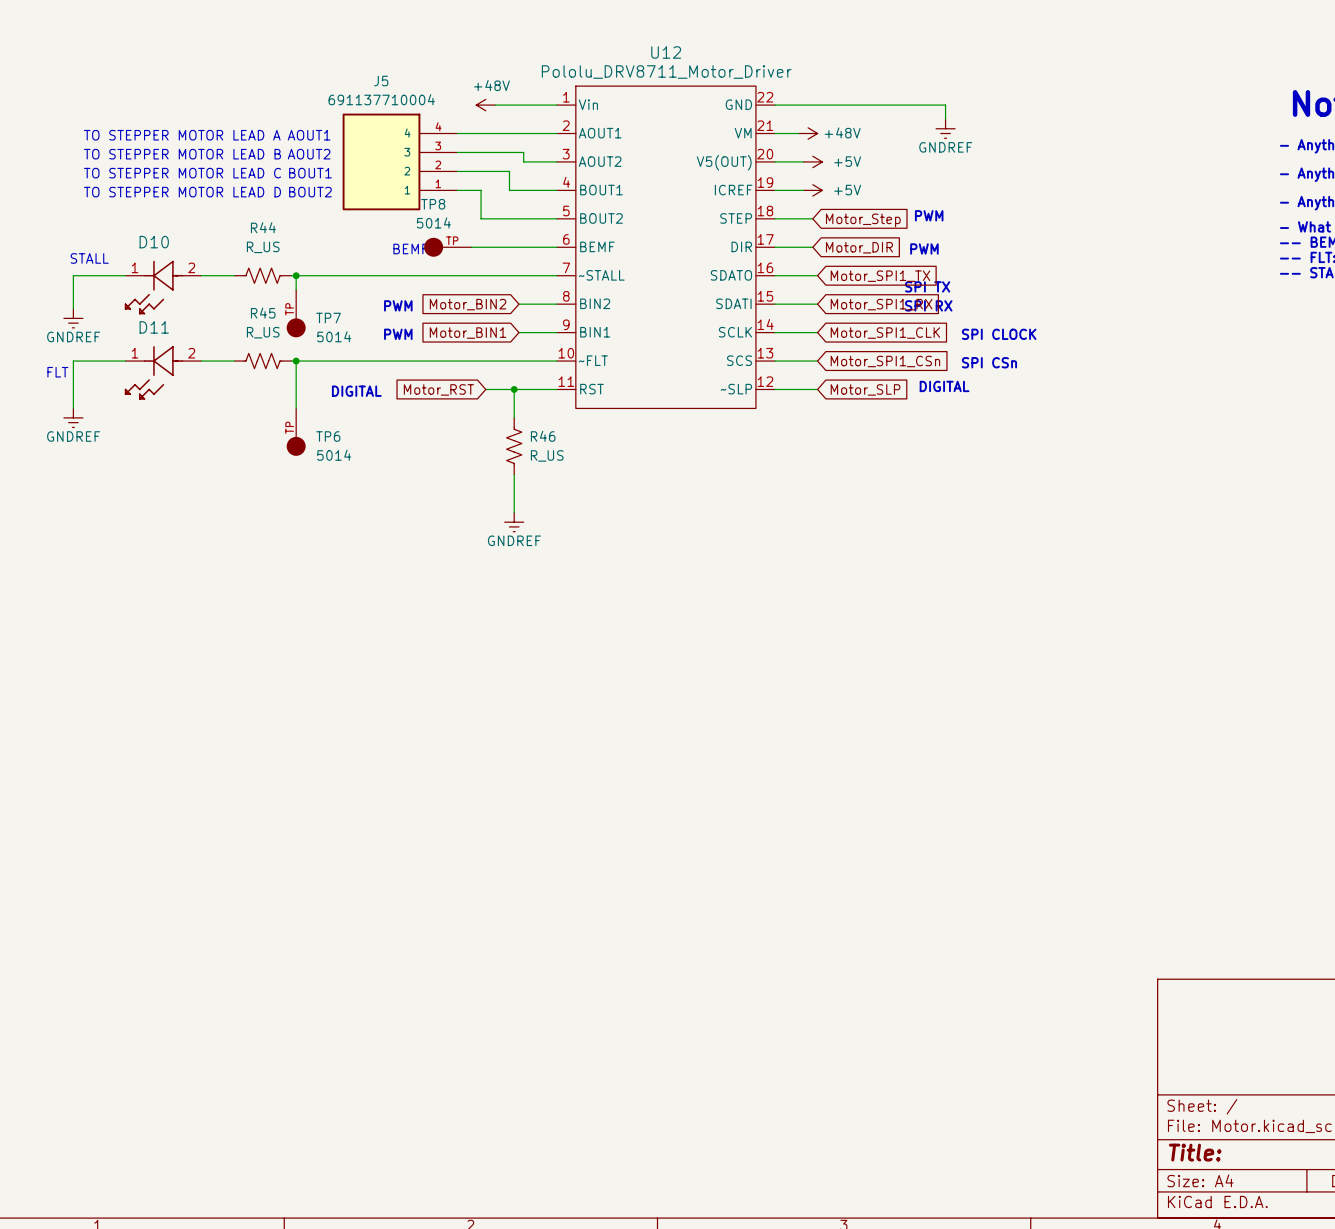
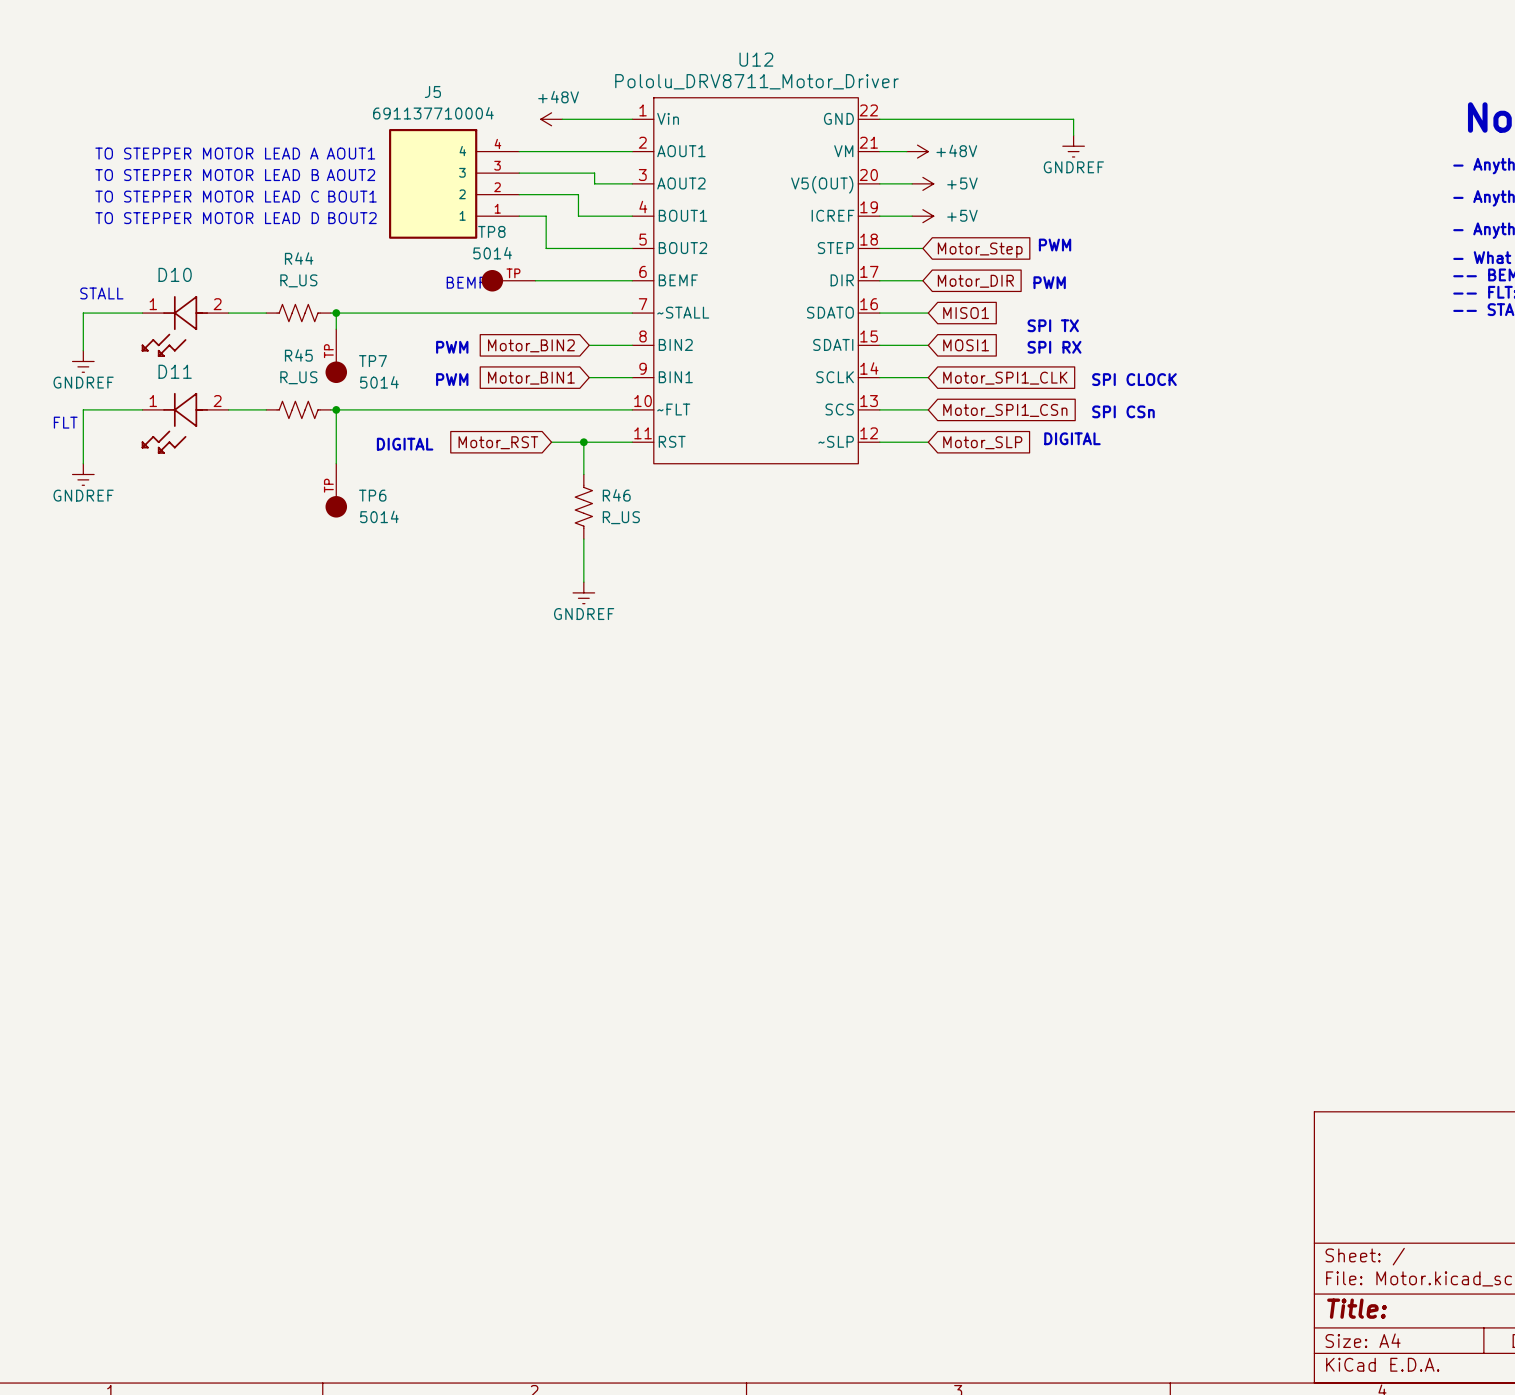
global label: Motor_SPI1_TX (880, 276) -> MISO1 (966, 313)
global label: Motor_SPI1_RX (881, 304) -> MOSI1 (966, 345)

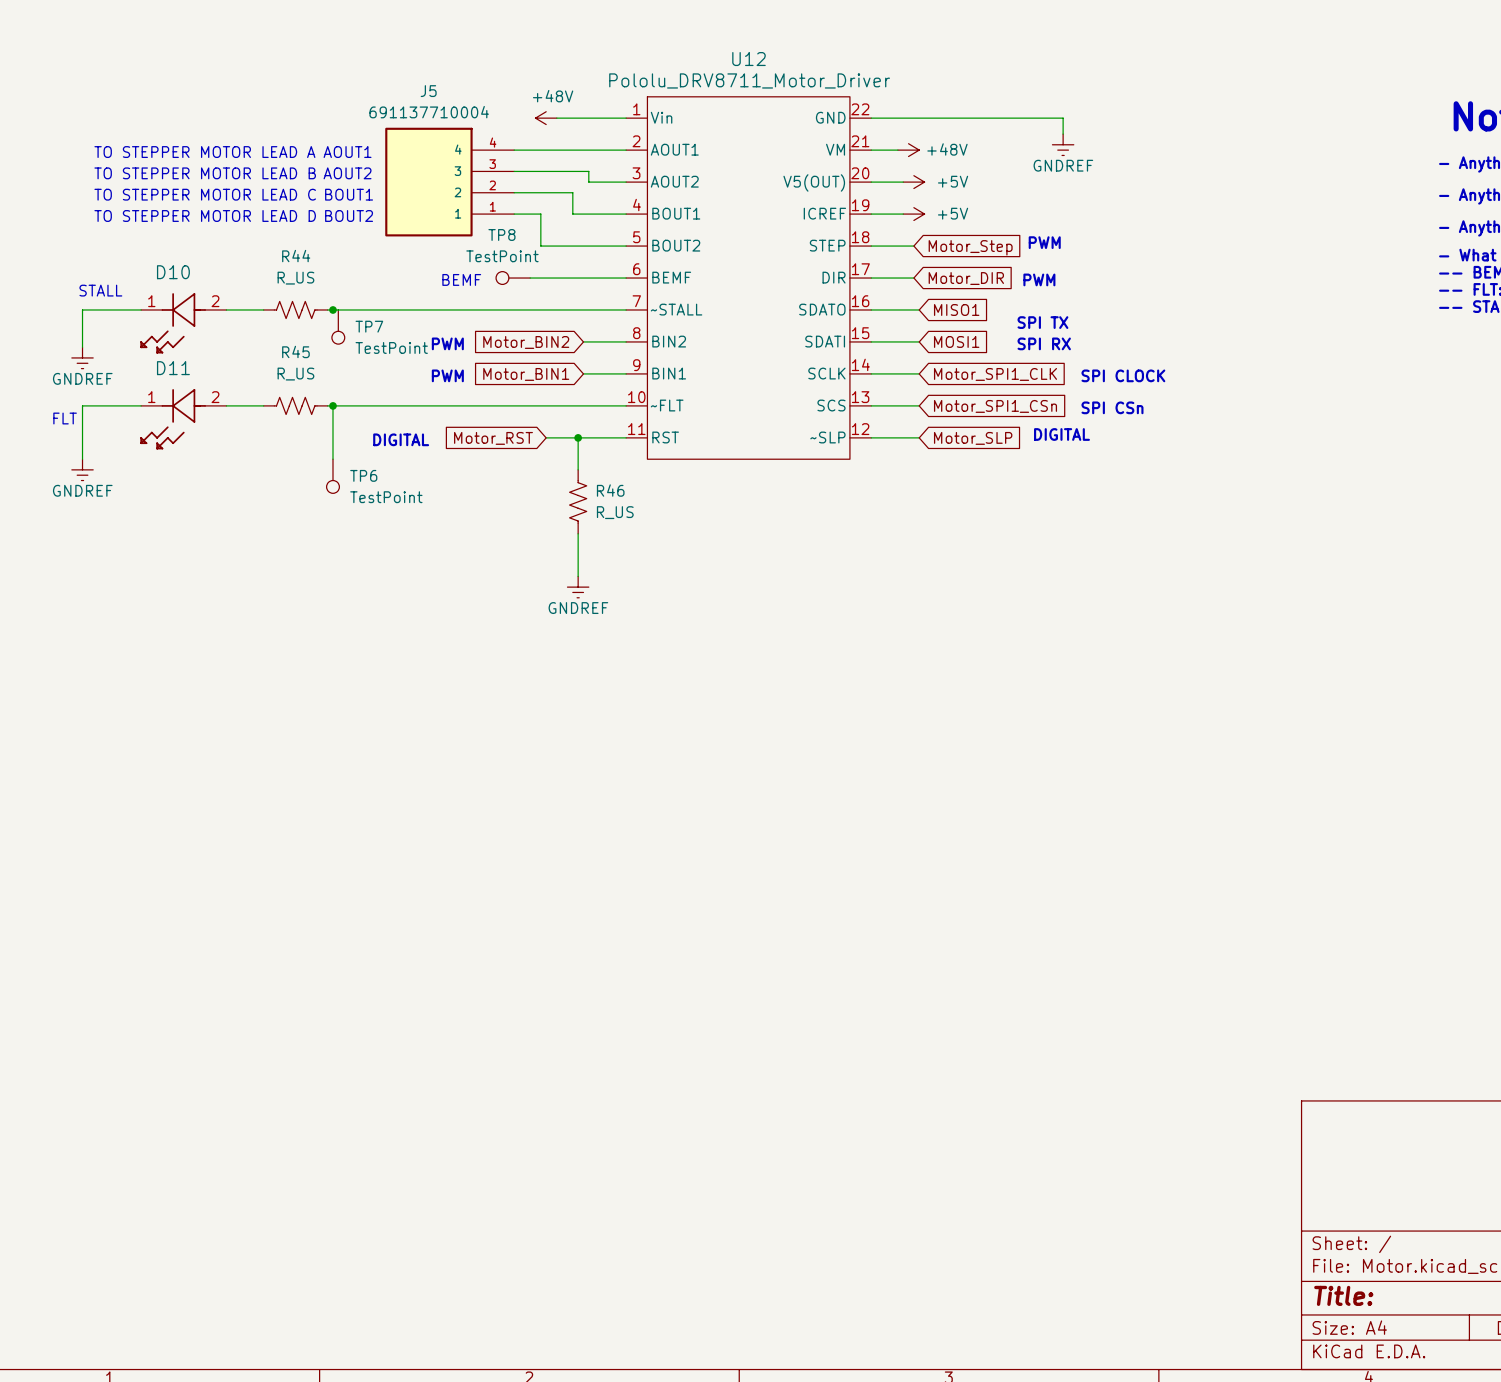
TP8 value: 5014 (492, 253) -> TestPoint (502, 256)
TP8 symbol: [481, 269, 536, 292] -> [496, 271, 531, 285]
wire: (336, 313) (336, 329) -> none
TP7 symbol: [325, 329, 348, 384] -> [331, 309, 345, 345]
TP7 value: 5014 (379, 382) -> TestPoint (391, 347)
TP6 symbol: [325, 463, 348, 518] -> [326, 459, 340, 494]
TP6 value: 5014 (379, 516) -> TestPoint (386, 497)

